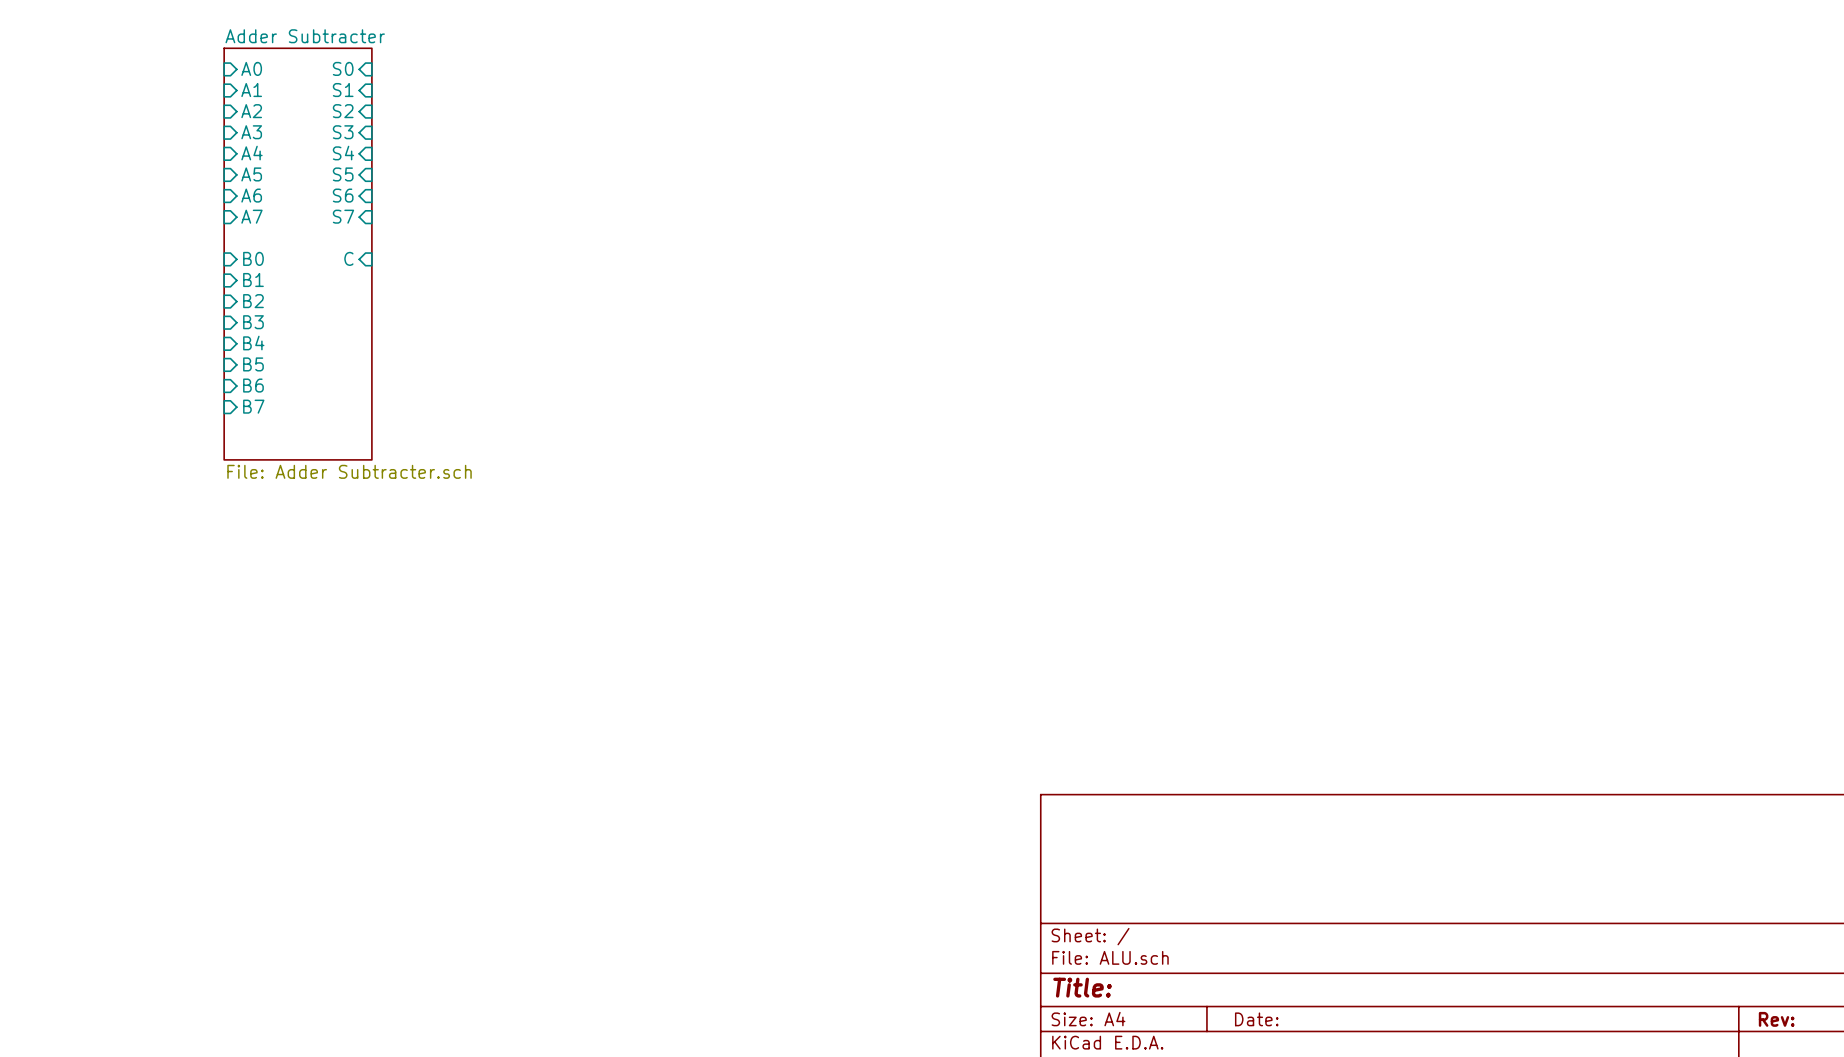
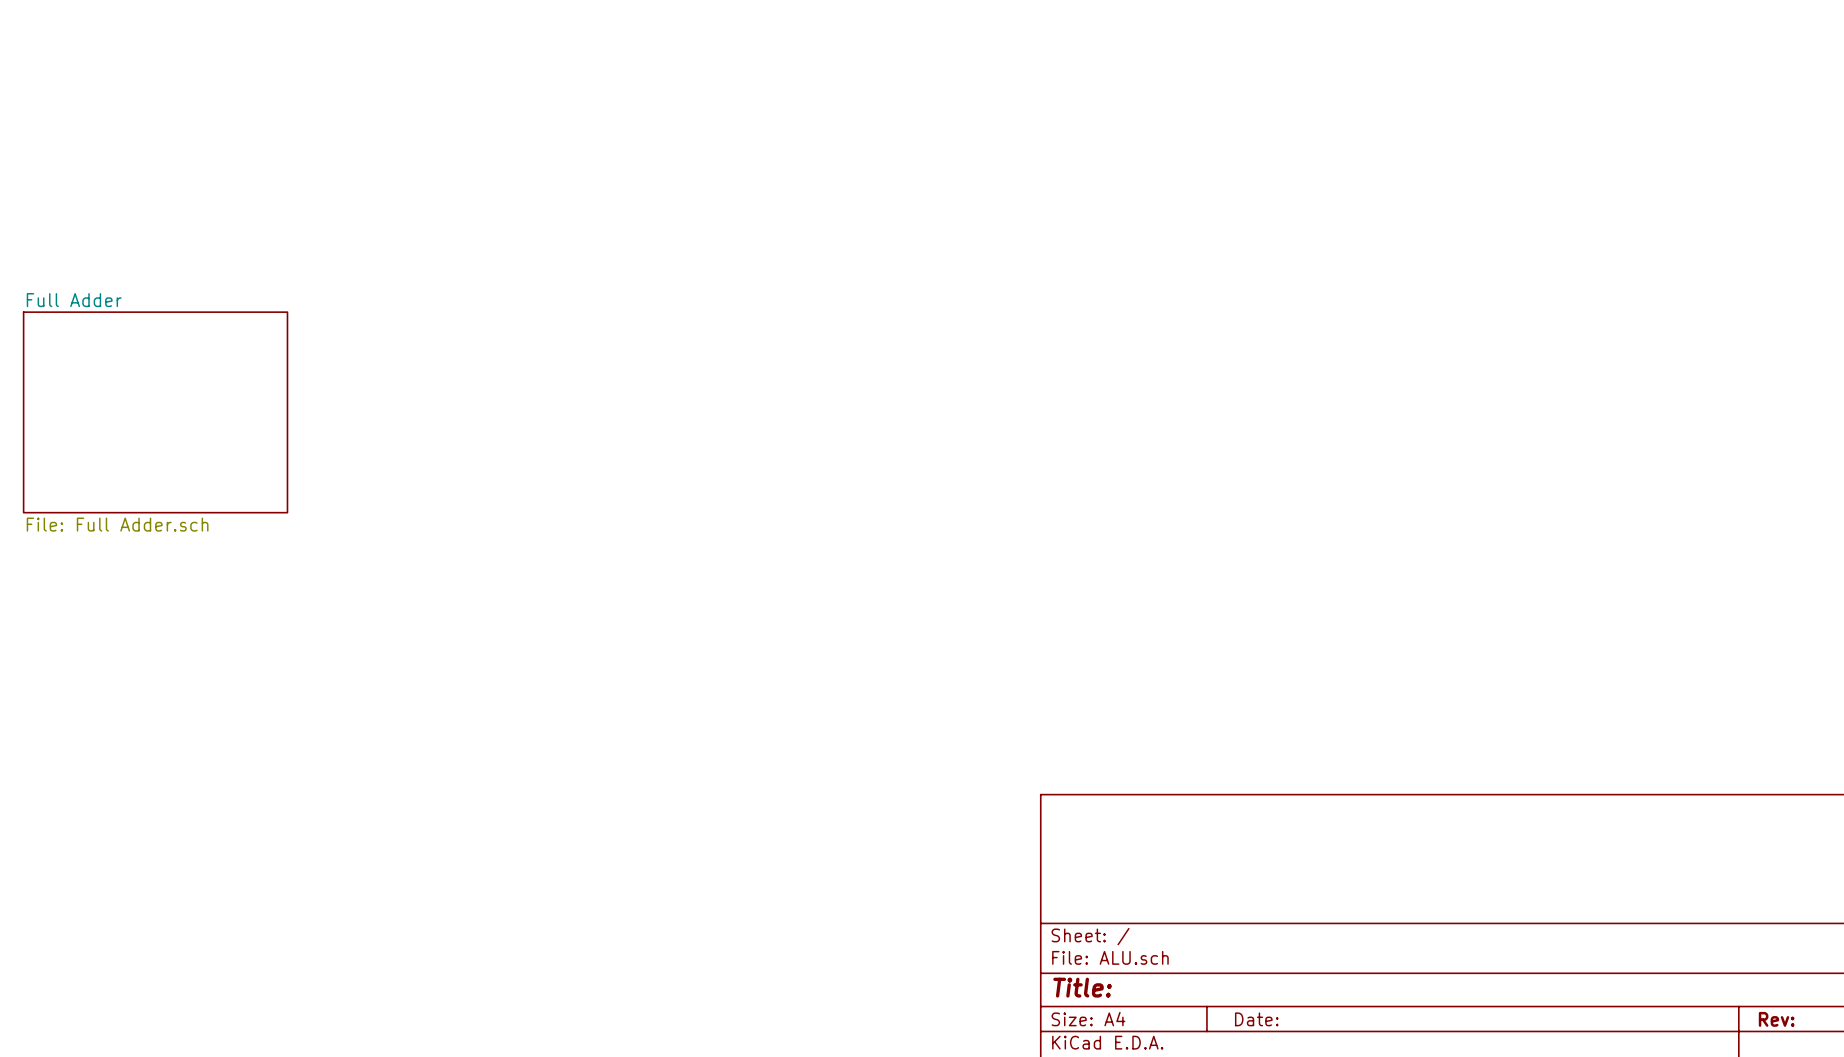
sheet pin: A0 (251, 68) -> none
sheet pin: S0 (343, 68) -> none
sheet pin: A1 (251, 90) -> none
sheet pin: S1 (343, 90) -> none
sheet pin: A2 (251, 111) -> none
sheet pin: S2 (343, 111) -> none
sheet pin: A3 (251, 132) -> none
sheet pin: S3 (343, 132) -> none
sheet pin: A4 (251, 153) -> none
sheet pin: S4 (343, 153) -> none
sheet pin: A5 (251, 174) -> none
sheet pin: S5 (343, 174) -> none
sheet pin: A6 (251, 195) -> none
sheet pin: S6 (343, 195) -> none
sheet pin: A7 (251, 216) -> none
sheet pin: S7 (343, 216) -> none
sheet Adder Subtracter: File: Adder Subtracter.sch (298, 254) -> none
sheet pin: B0 (253, 258) -> none
sheet pin: C (348, 258) -> none
sheet pin: B1 (253, 280) -> none
sheet pin: B2 (253, 301) -> none
sheet pin: B3 (253, 322) -> none
sheet pin: B4 (253, 343) -> none
sheet pin: B5 (253, 364) -> none
sheet pin: B6 (253, 385) -> none
sheet pin: B7 (253, 406) -> none
sheet Full Adder: none -> File: Full Adder.sch (155, 412)

